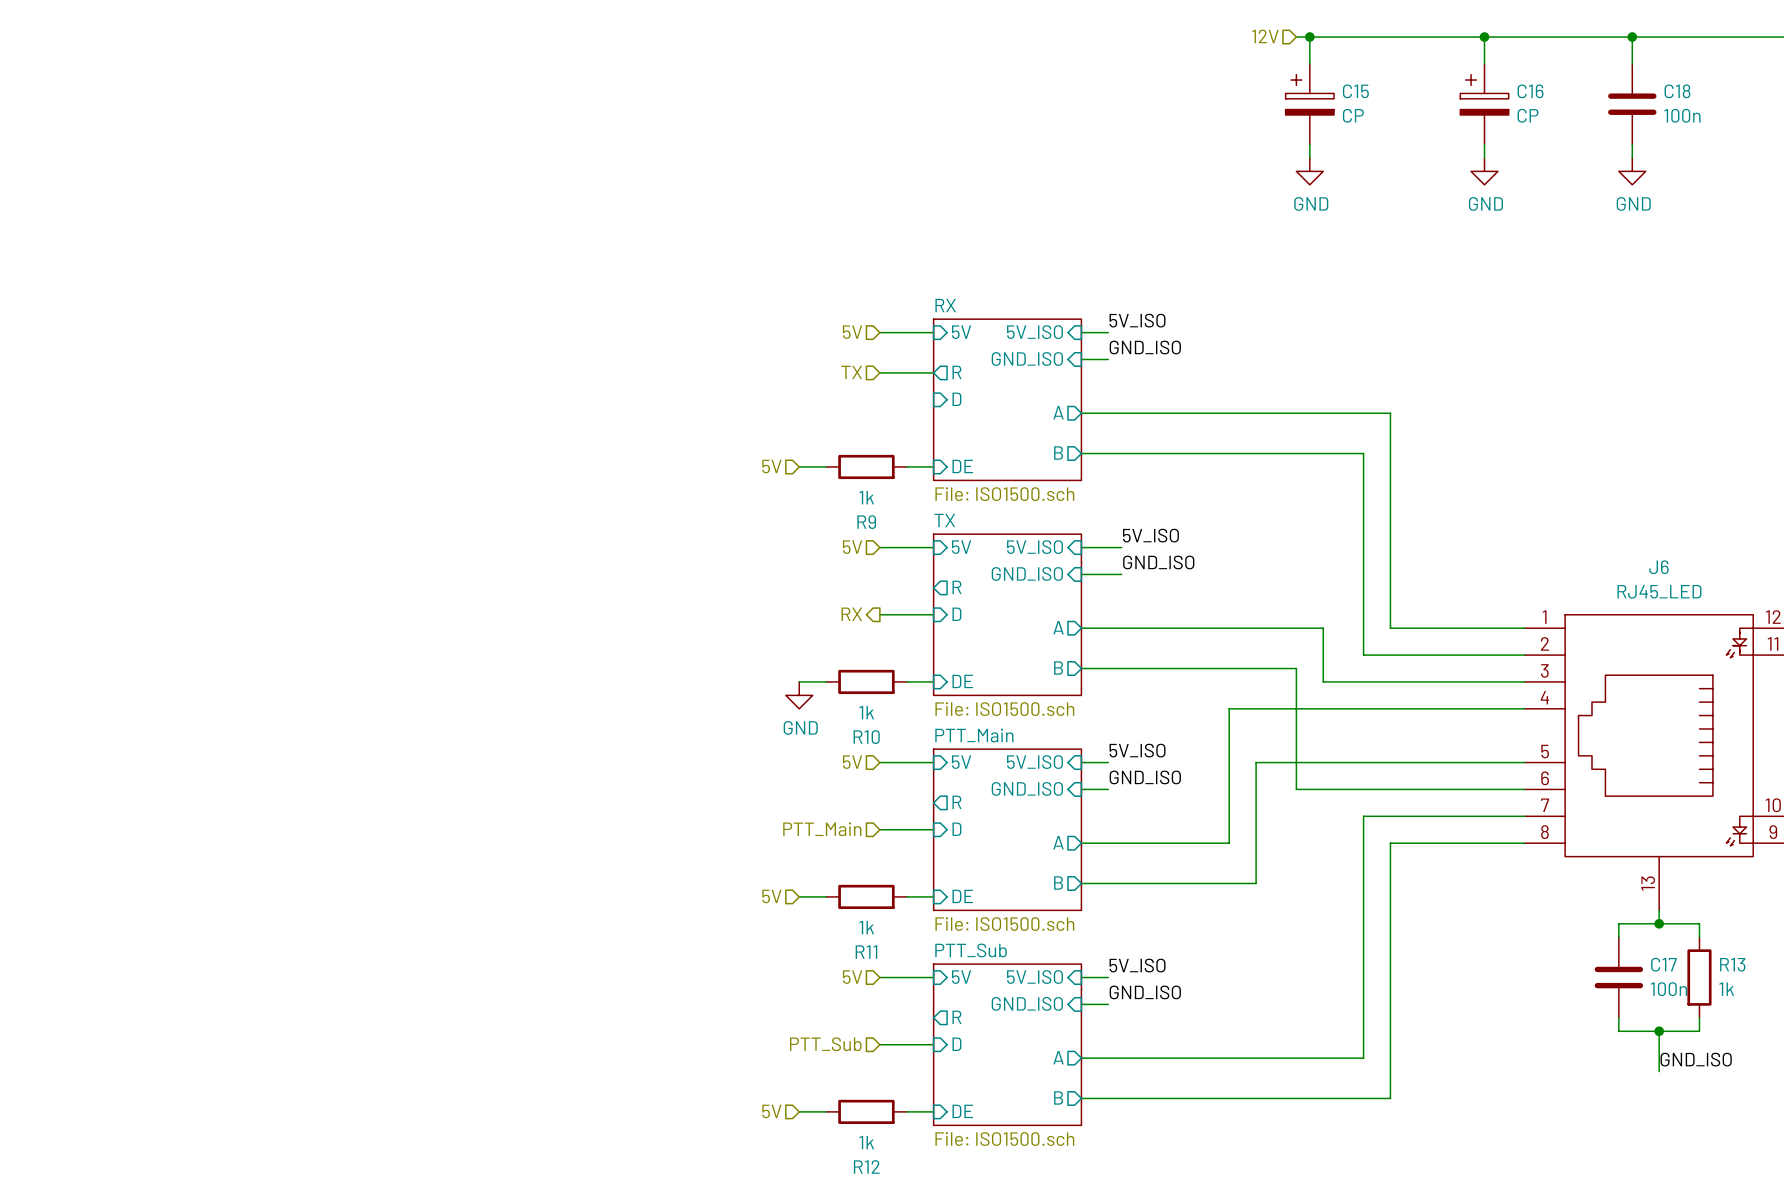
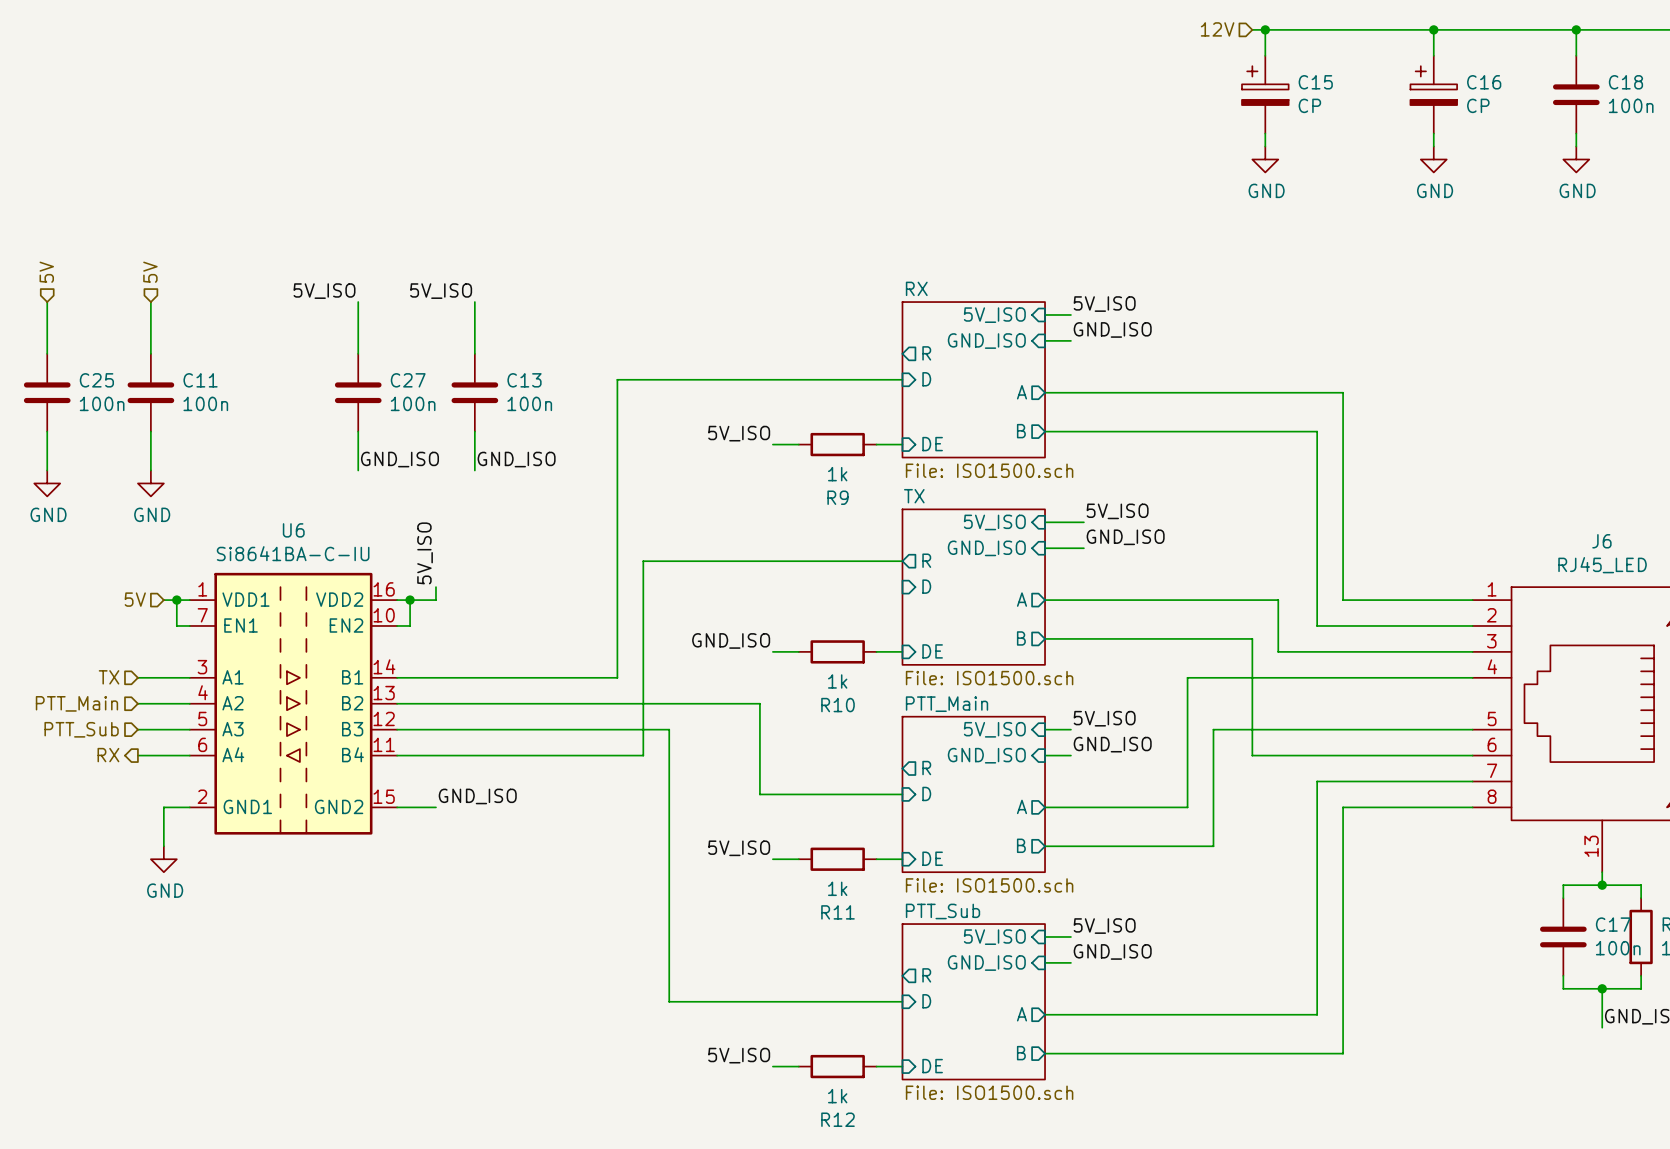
hierarchical label: none -> 5V (46, 272)
hierarchical label: none -> 5V (150, 272)
label: none -> 5V_ISO (324, 291)
label: none -> 5V_ISO (441, 291)
wire: none -> (47, 302) (47, 353)
wire: none -> (150, 302) (150, 353)
wire: none -> (358, 302) (358, 353)
wire: none -> (474, 302) (474, 353)
hierarchical label: 5V (852, 332) -> none
wire: (879, 332) (933, 332) -> none
sheet pin: 5V (961, 332) -> none
hierarchical label: TX (851, 372) -> none
wire: (879, 372) (933, 372) -> none
wire: none -> (902, 379) (617, 379) (617, 677) (397, 677)
C25: none -> 100n (47, 392)
C11: none -> 100n (150, 392)
C27: none -> 100n (358, 392)
C13: none -> 100n (474, 392)
wire: none -> (47, 431) (47, 470)
wire: none -> (150, 431) (150, 470)
wire: none -> (358, 431) (358, 470)
wire: none -> (474, 431) (474, 470)
label: none -> 5V_ISO (739, 433)
hierarchical label: 5V (771, 466) -> none
label: none -> GND_ISO (399, 459)
label: none -> GND_ISO (516, 459)
power symbol: none -> GND (47, 483)
power symbol: none -> GND (150, 483)
hierarchical label: 5V (852, 547) -> none
wire: (879, 547) (933, 547) -> none
sheet pin: 5V (961, 547) -> none
label: none -> 5V_ISO (425, 553)
wire: none -> (902, 561) (643, 561) (643, 755) (397, 755)
wire: none -> (435, 587) (435, 600) (397, 600)
hierarchical label: RX (851, 614) -> none
wire: (879, 614) (933, 614) -> none
hierarchical label: none -> 5V (135, 599)
wire: none -> (163, 600) (189, 600)
wire: none -> (176, 600) (176, 625) (189, 625)
junction: none -> (176, 600)
wire: none -> (410, 600) (410, 625) (397, 625)
junction: none -> (410, 600)
label: none -> GND_ISO (731, 640)
power symbol: GND (799, 695) -> none
hierarchical label: none -> TX (109, 677)
wire: none -> (137, 677) (189, 677)
hierarchical label: none -> PTT_Main (76, 703)
wire: none -> (137, 703) (189, 703)
U6: none -> Si8641BA-C-IU (293, 703)
wire: none -> (397, 703) (759, 703) (759, 794) (850, 794)
hierarchical label: none -> PTT_Sub (81, 729)
wire: none -> (137, 729) (189, 729)
wire: none -> (397, 729) (669, 729) (669, 1001) (850, 1001)
hierarchical label: 5V (852, 762) -> none
wire: (879, 762) (933, 762) -> none
sheet pin: 5V (961, 762) -> none
hierarchical label: none -> RX (108, 755)
wire: none -> (137, 755) (189, 755)
hierarchical label: PTT_Main (822, 829) -> none
label: none -> GND_ISO (477, 796)
wire: none -> (189, 807) (163, 807) (163, 846)
wire: none -> (397, 807) (435, 807)
label: none -> 5V_ISO (739, 848)
power symbol: none -> GND (163, 859)
hierarchical label: 5V (771, 896) -> none
hierarchical label: 5V (852, 977) -> none
wire: (879, 977) (933, 977) -> none
sheet pin: 5V (961, 977) -> none
hierarchical label: PTT_Sub (825, 1044) -> none
label: none -> 5V_ISO (739, 1055)
hierarchical label: 5V (771, 1111) -> none

